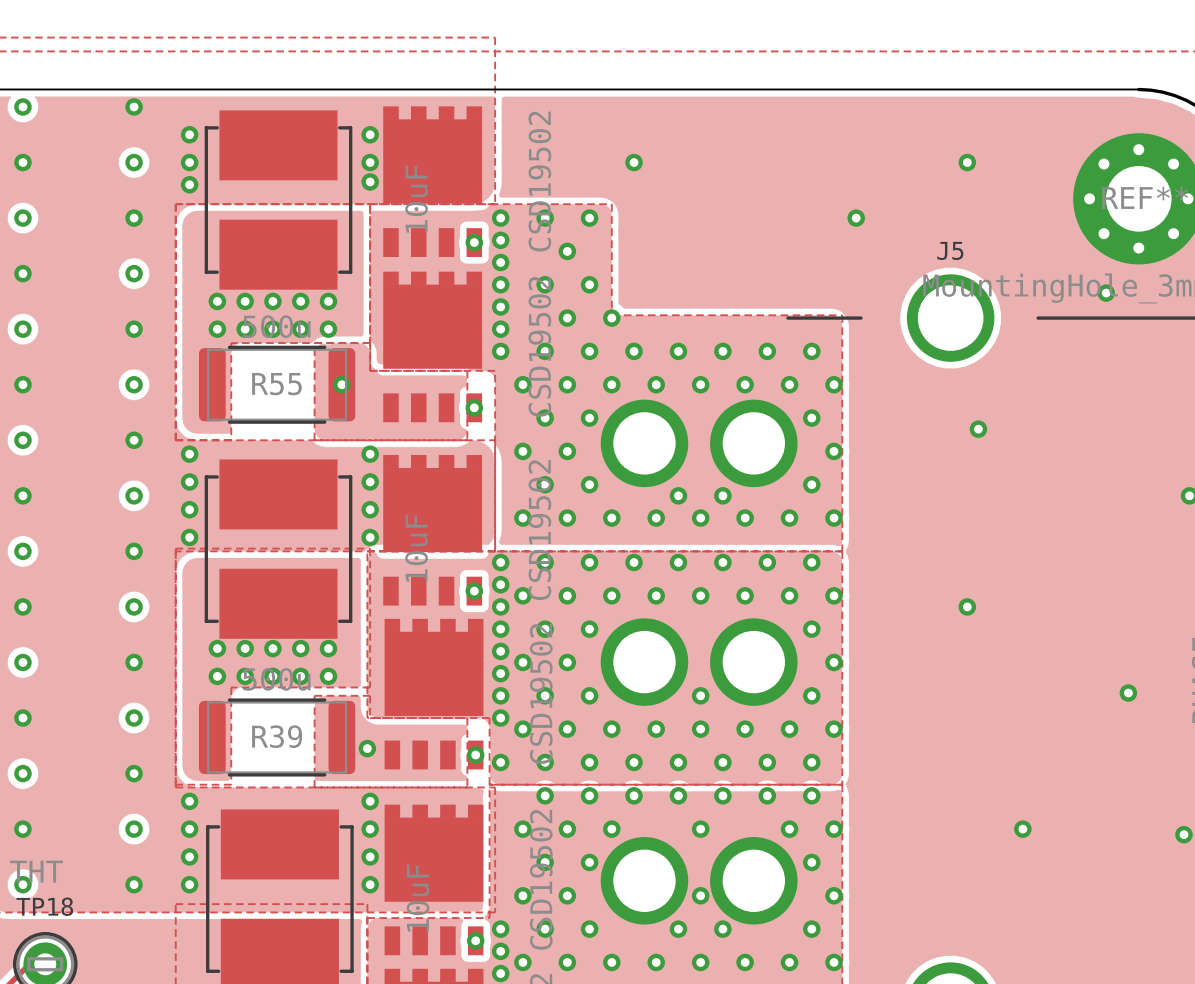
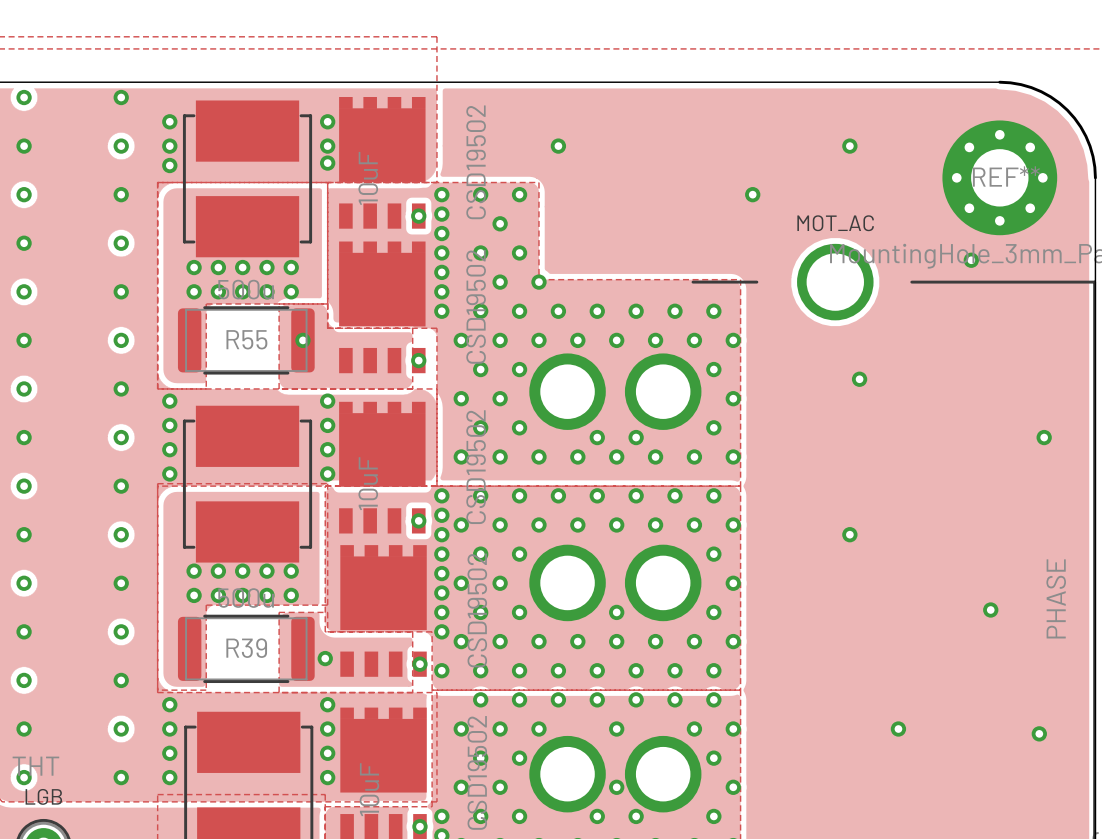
J5 name: J5 (950, 250) -> MOT_AC (835, 223)
TP18 name: TP18 (44, 906) -> LGB (43, 796)

